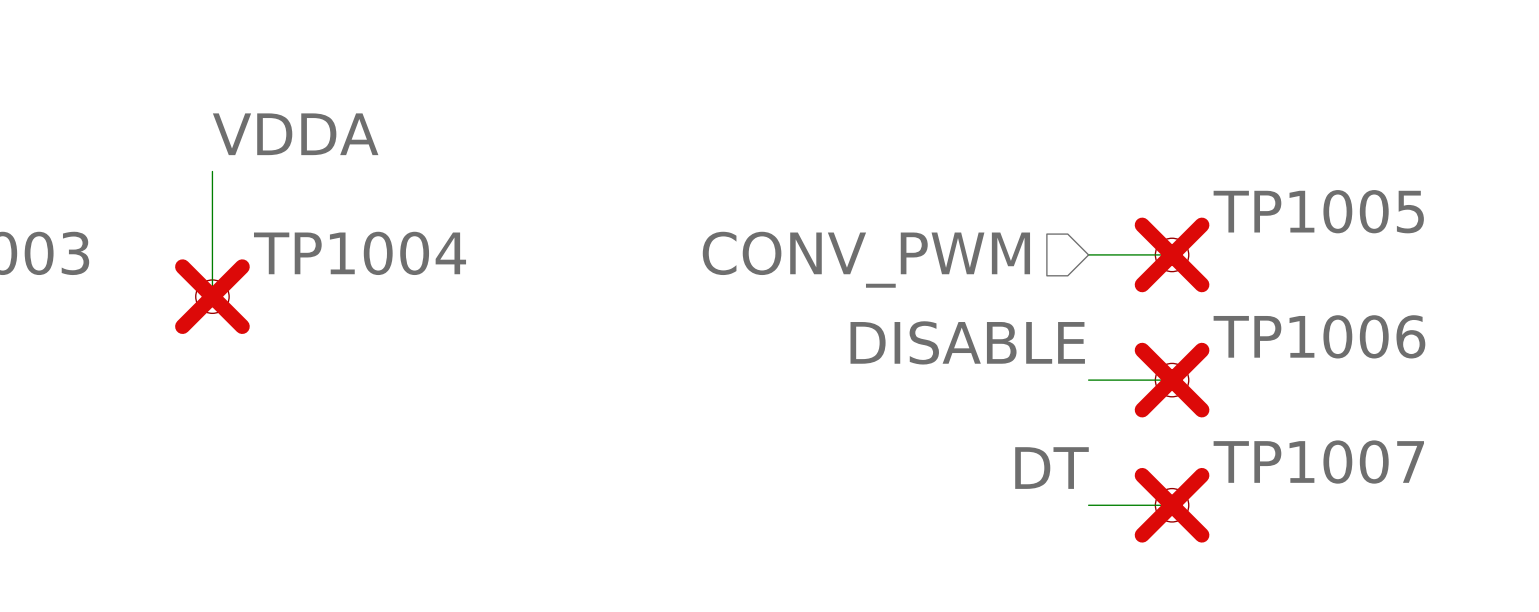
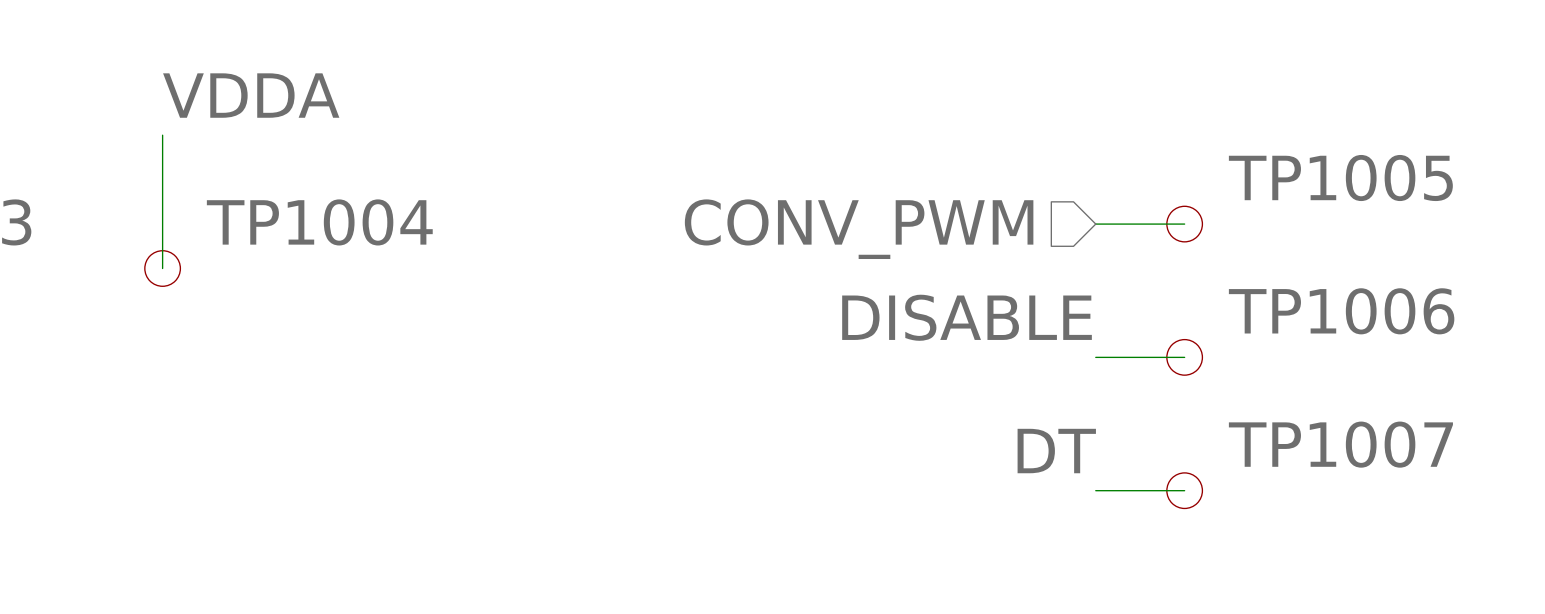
TP1005 do-not-place cross: (1172, 254) -> none
TP1004 do-not-place cross: (212, 296) -> none
TP1006 do-not-place cross: (1172, 380) -> none
TP1007 do-not-place cross: (1172, 505) -> none

